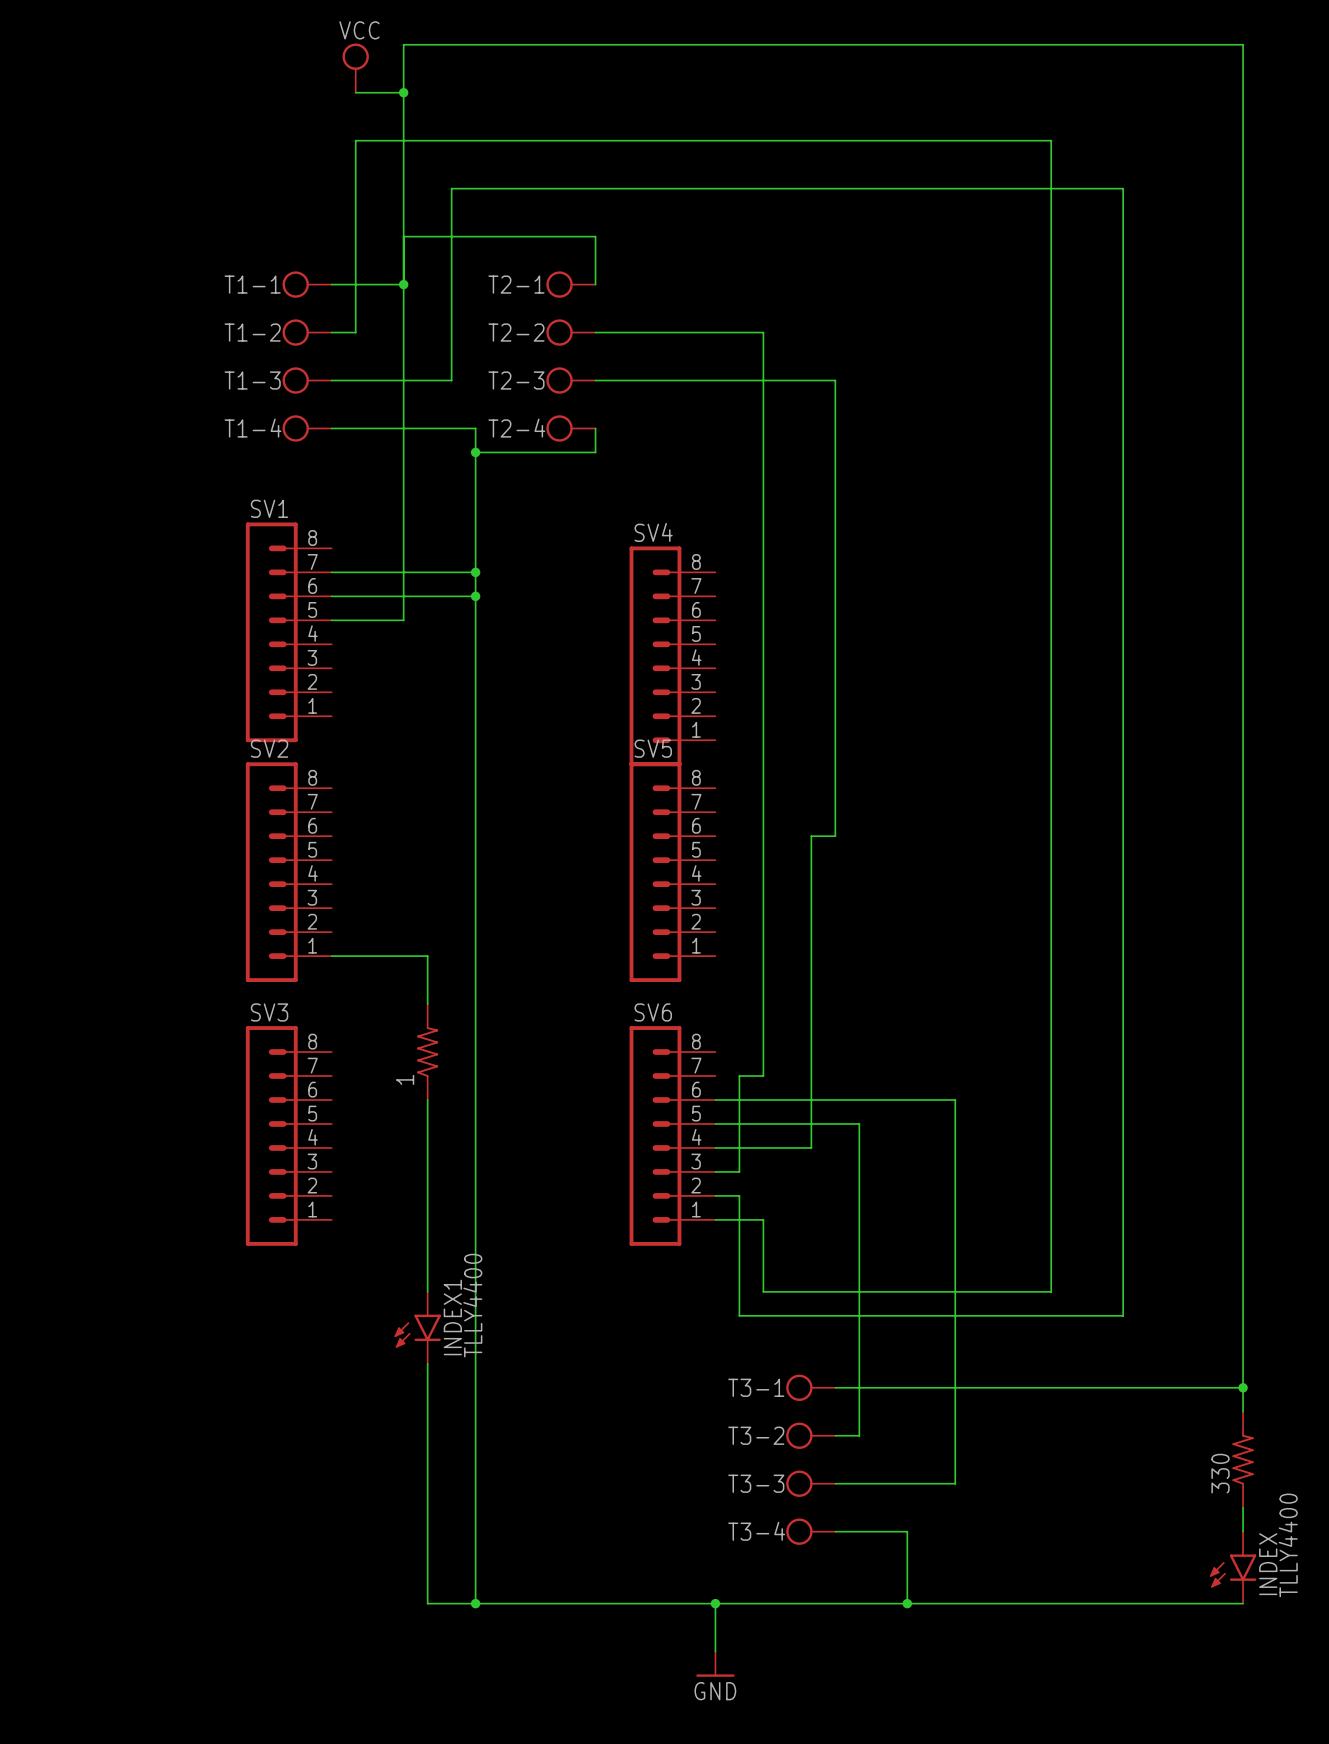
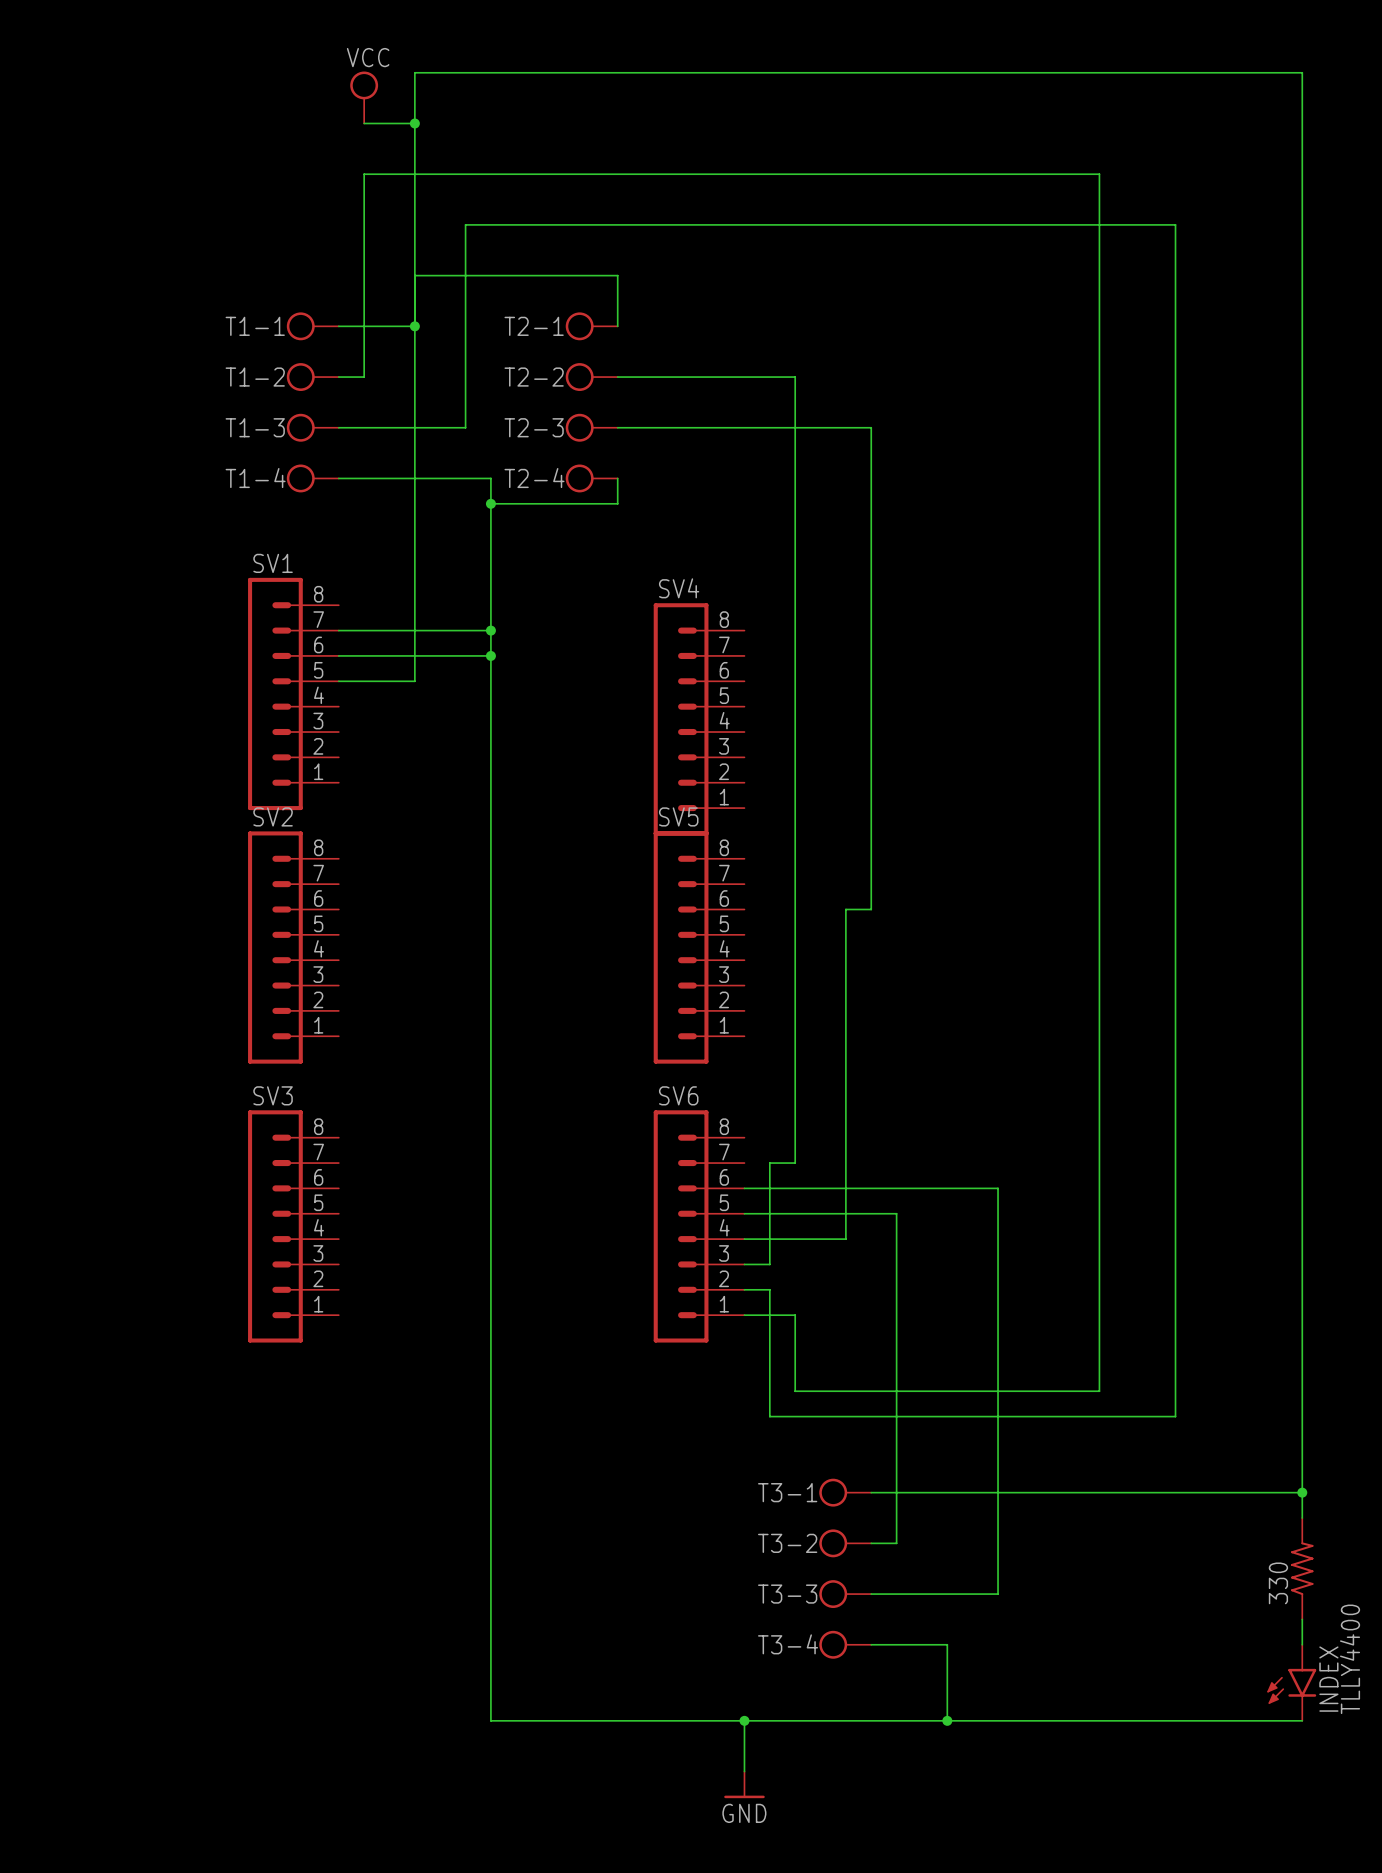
wire: (331, 956) (427, 956) (427, 1004) -> none
1: (427, 1052) -> none
wire: (427, 1100) (427, 1291) -> none
INDEX1: TLLY4400 (417, 1327) -> none
wire: (427, 1363) (427, 1603) (475, 1603) -> none
junction: (475, 1603) -> none

